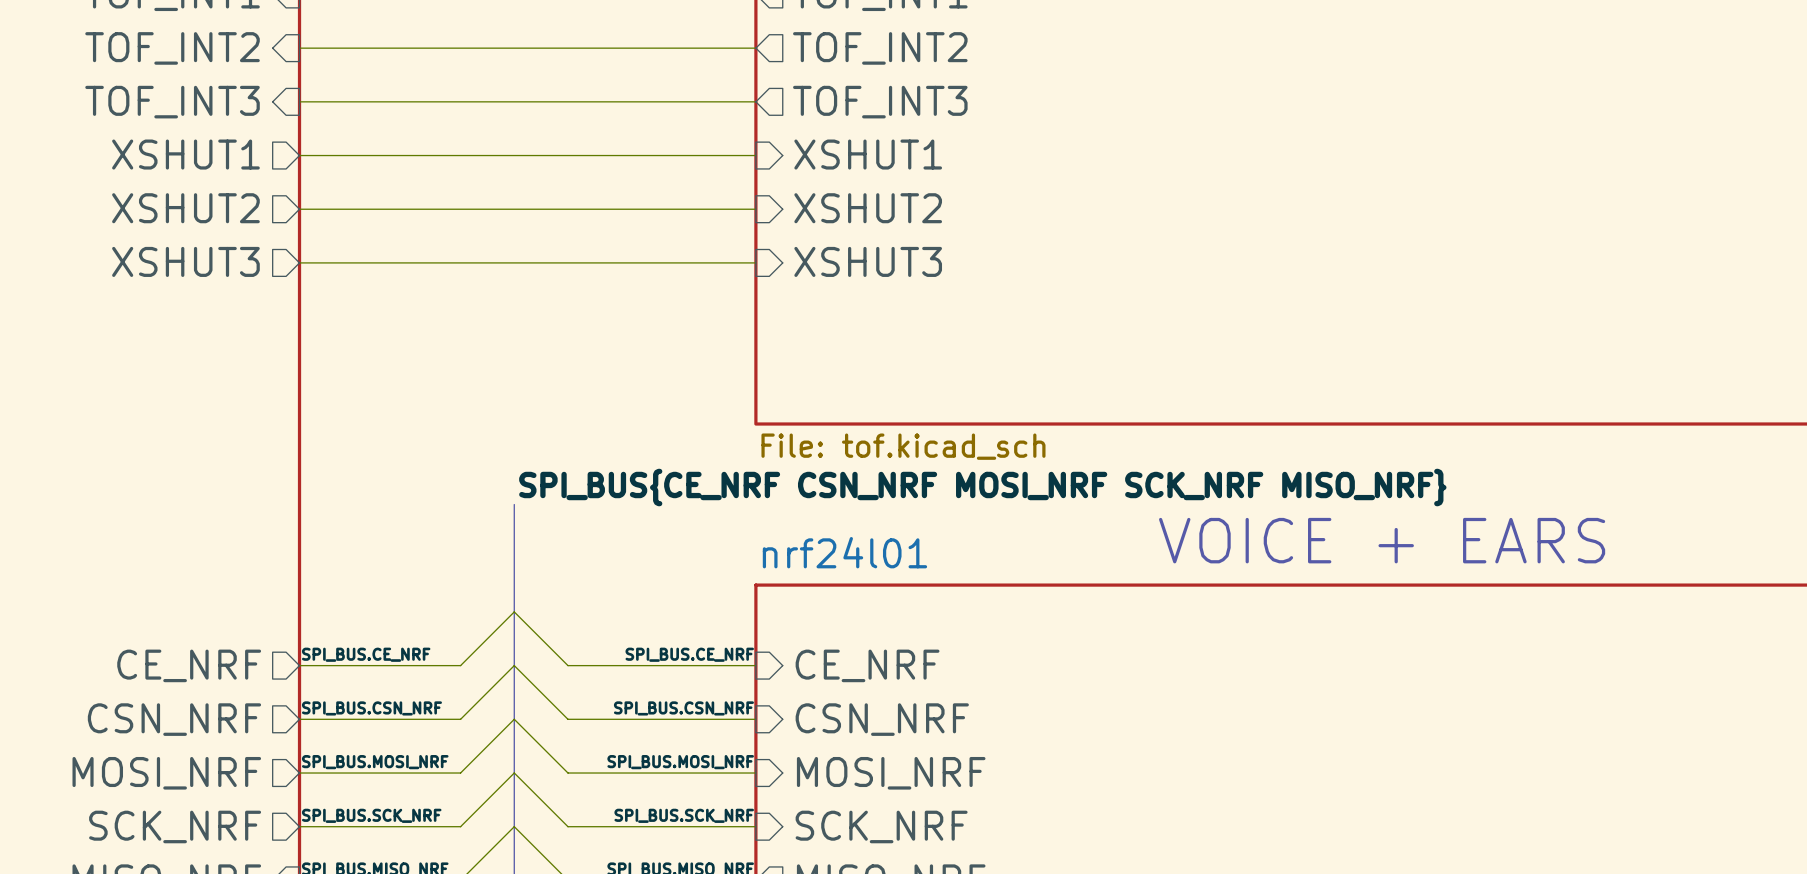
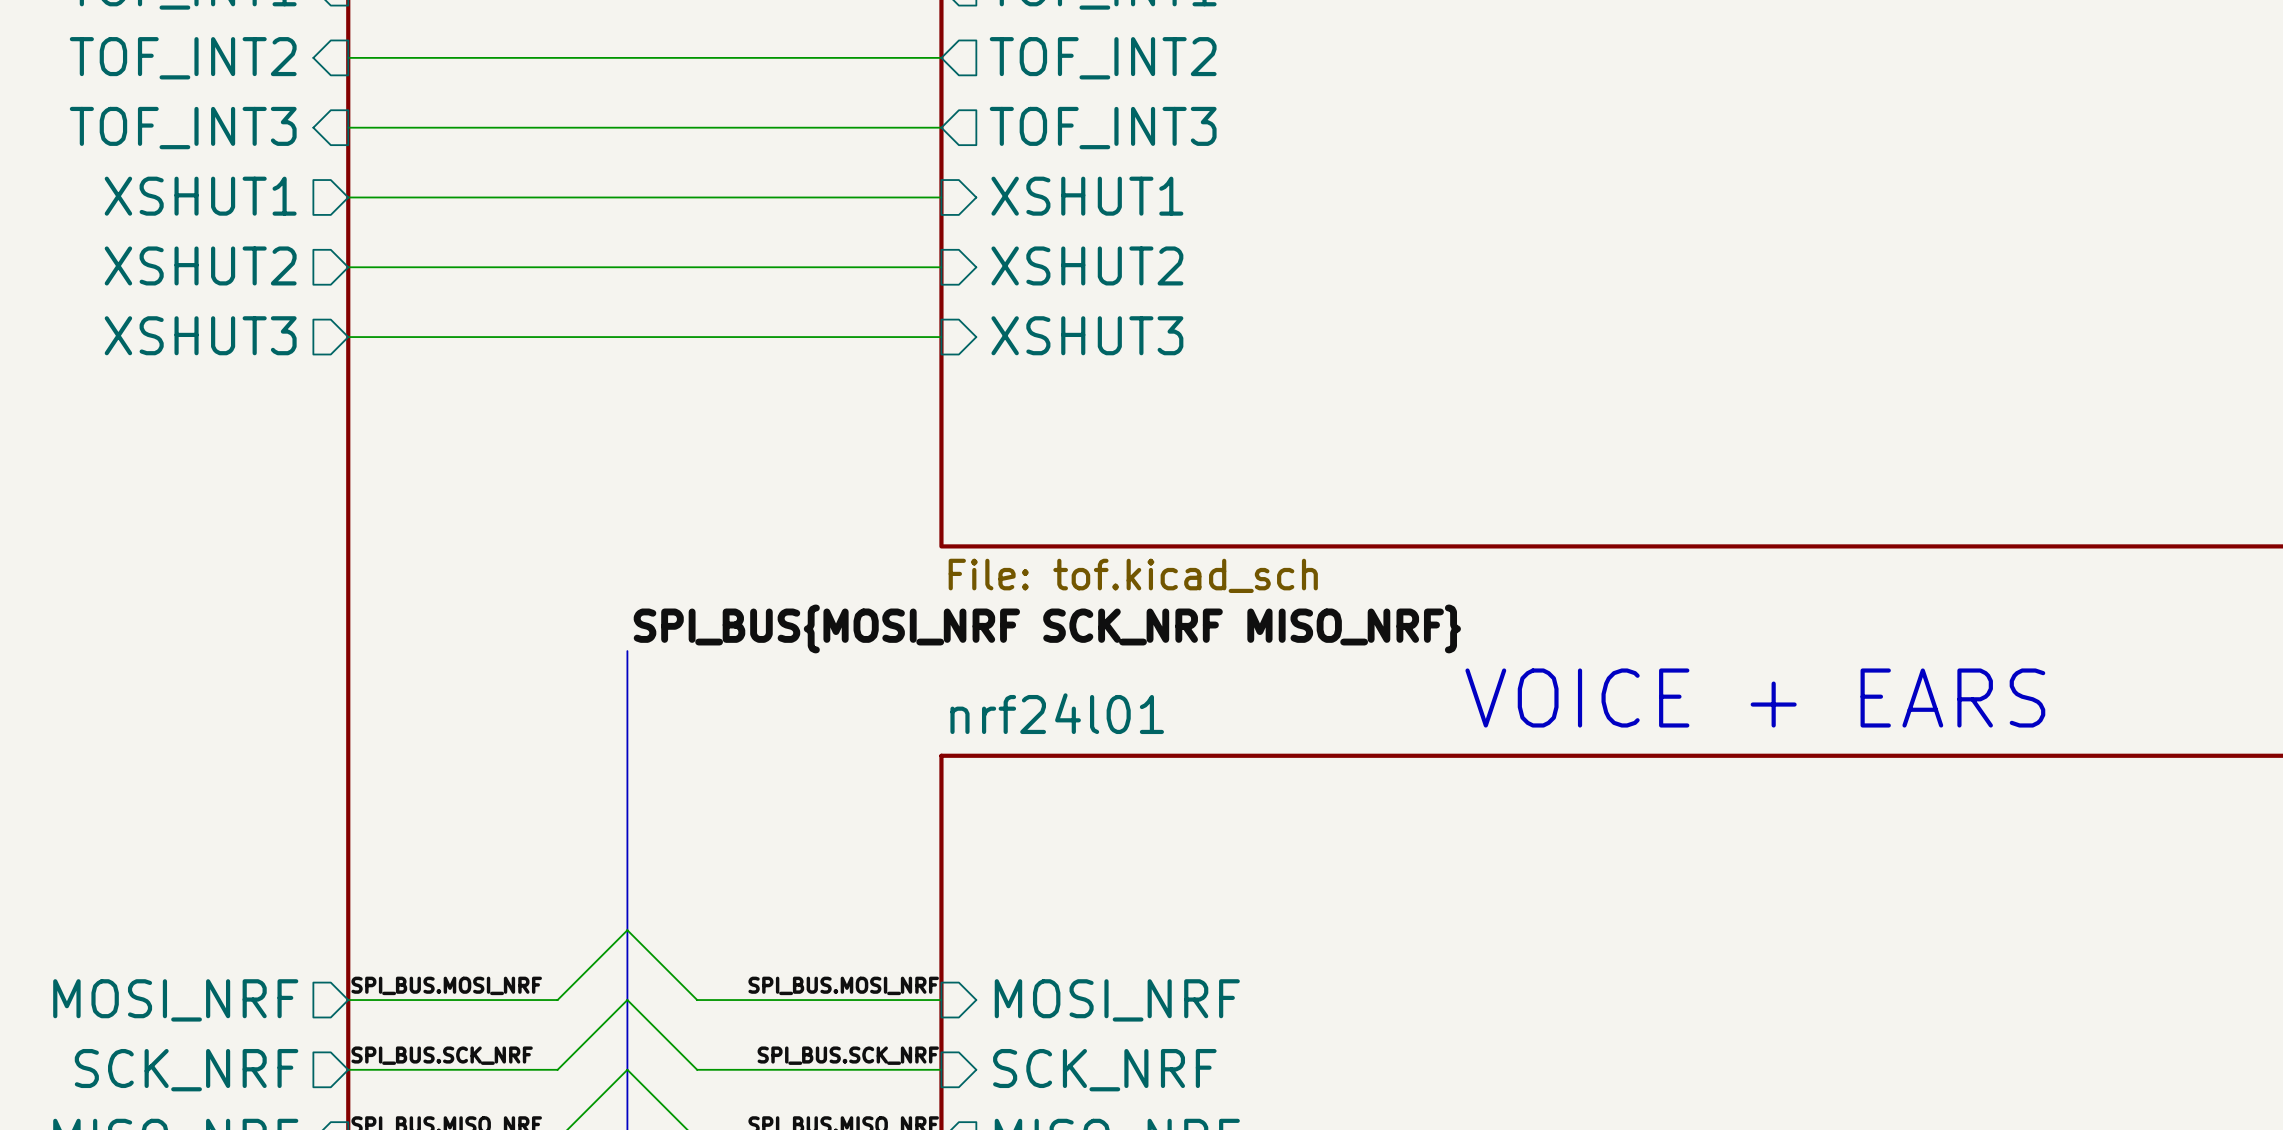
label: SPI_BUS{CE_NRF CSN_NRF MOSI_NRF SCK_NRF MISO_NRF} (982, 487) -> SPI_BUS{MOSI_NRF SCK_NRF MISO_NRF} (1047, 628)
label: SPI_BUS.CE_NRF (366, 654) -> none
label: SPI_BUS.CE_NRF (689, 654) -> none
sheet pin: CE_NRF (189, 665) -> none
wire: (299, 665) (460, 665) (514, 611) (567, 665) (755, 665) -> none
sheet pin: CE_NRF (867, 665) -> none
label: SPI_BUS.CSN_NRF (371, 708) -> none
label: SPI_BUS.CSN_NRF (683, 708) -> none
sheet pin: CSN_NRF (174, 719) -> none
wire: (299, 719) (460, 719) (514, 665) (567, 719) (755, 719) -> none
sheet pin: CSN_NRF (882, 719) -> none

